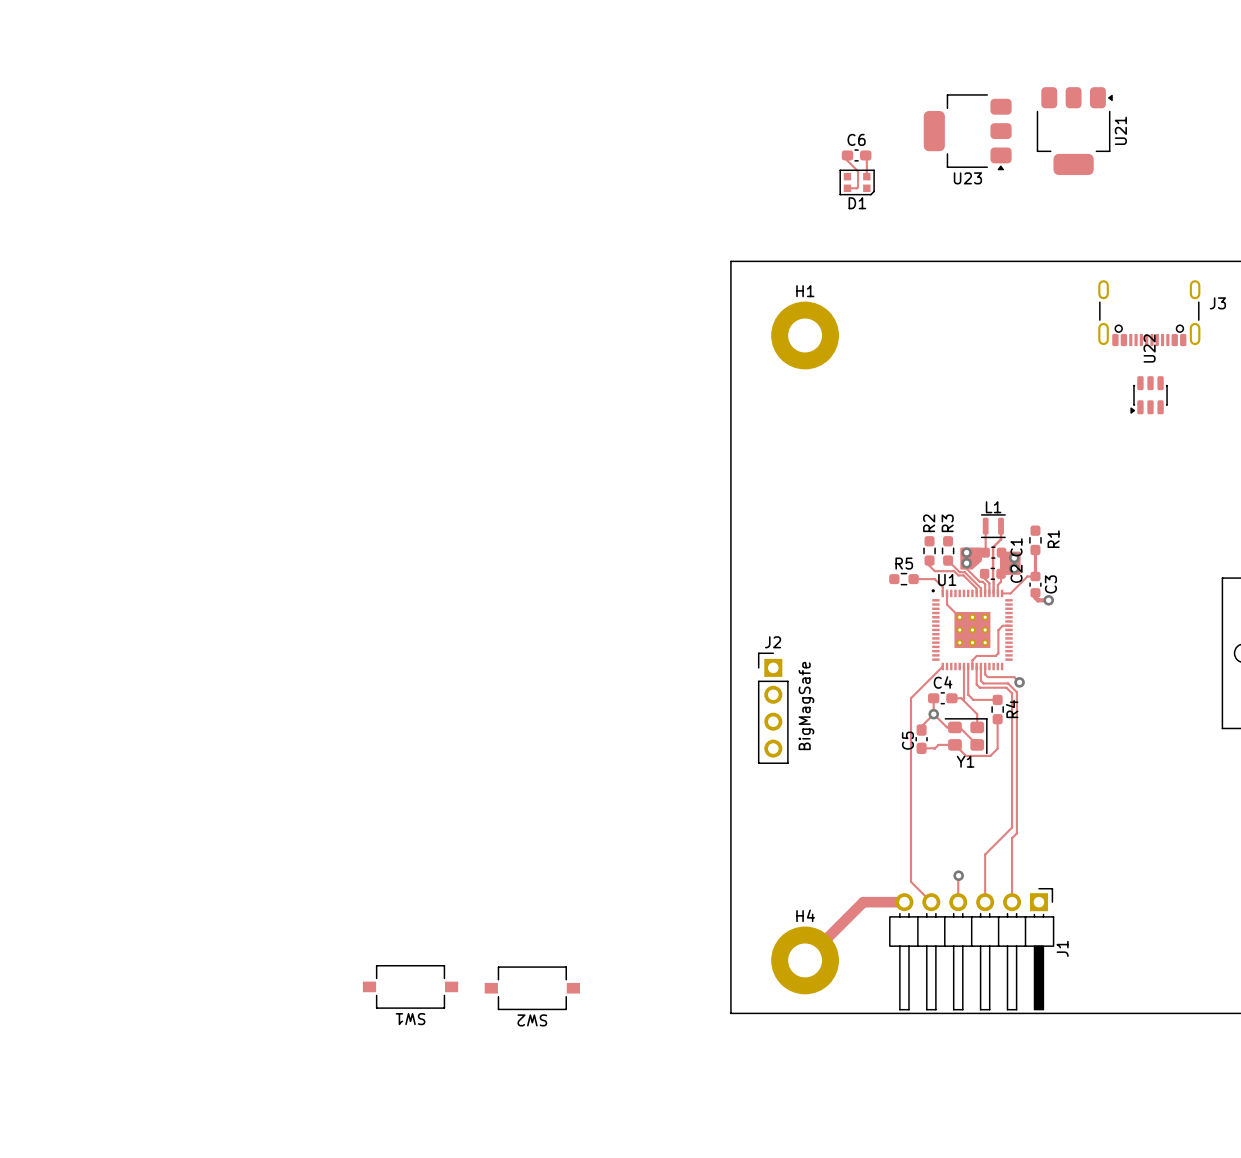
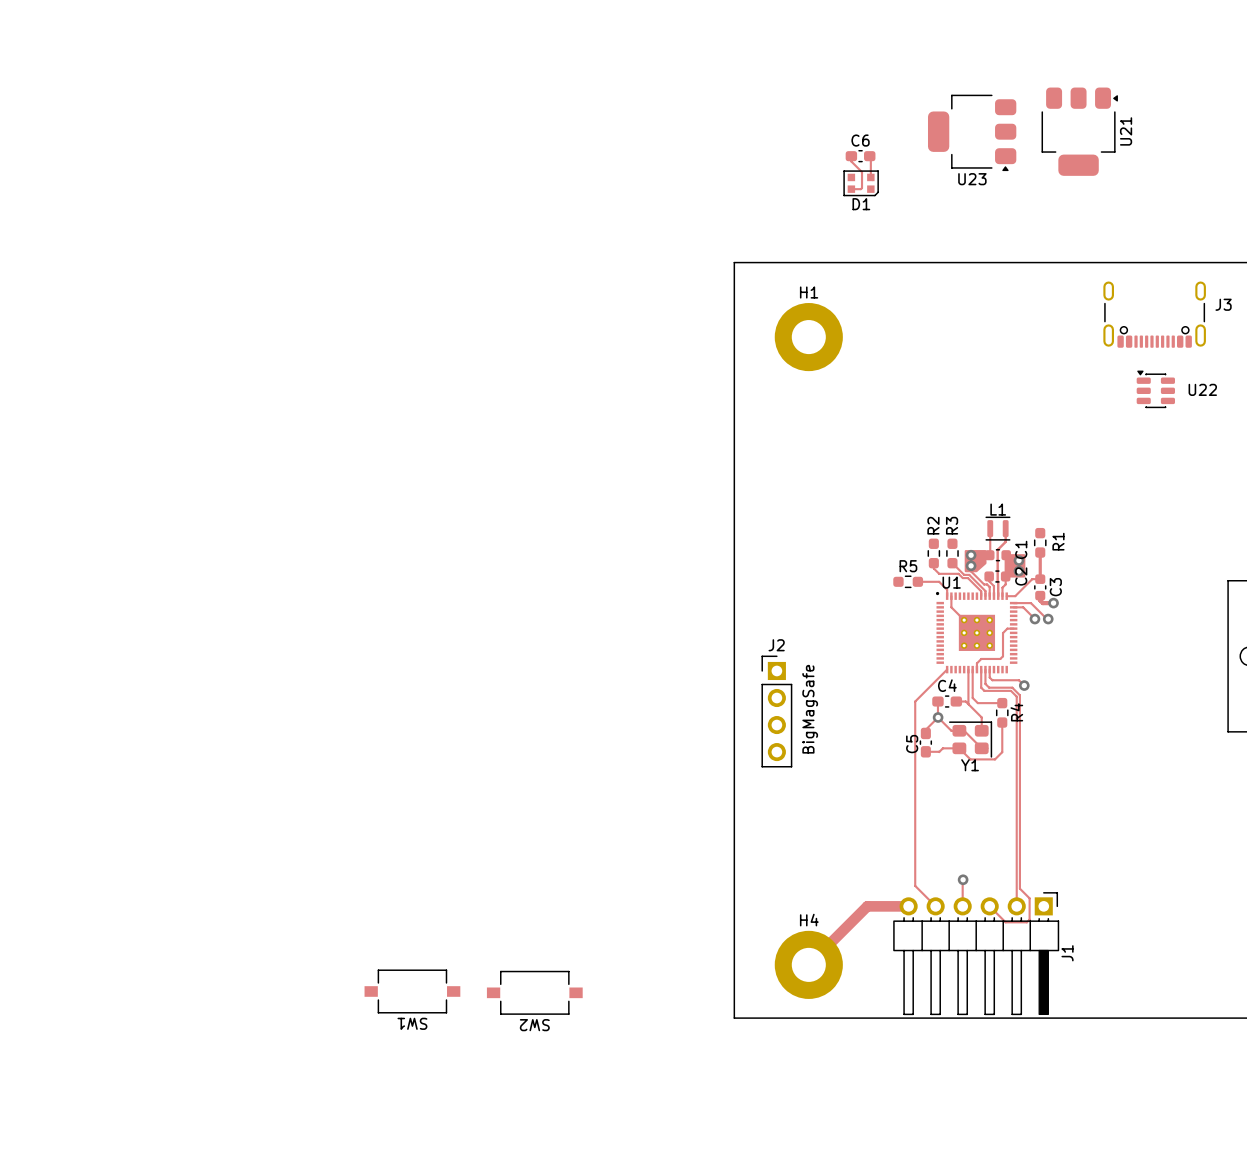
U22 rotation: 0° (1149, 395) -> 90° clockwise (1155, 389)
track: none -> (1013, 603) (1030, 603) (1048, 619)
track: none -> (1013, 607) (1023, 607) (1034, 619)
via: none -> (1034, 619)
via: none -> (1048, 619)
track: (983, 683) (1008, 683) (1016, 692) (1016, 833) (1012, 838) -> (988, 686) (1012, 687) (1019, 695) (1019, 888) (1029, 898) (1029, 919) (1026, 922) (1005, 922) (989, 906)
track: (1012, 827) (985, 854) (985, 902) -> (1016, 831) (1016, 842)

